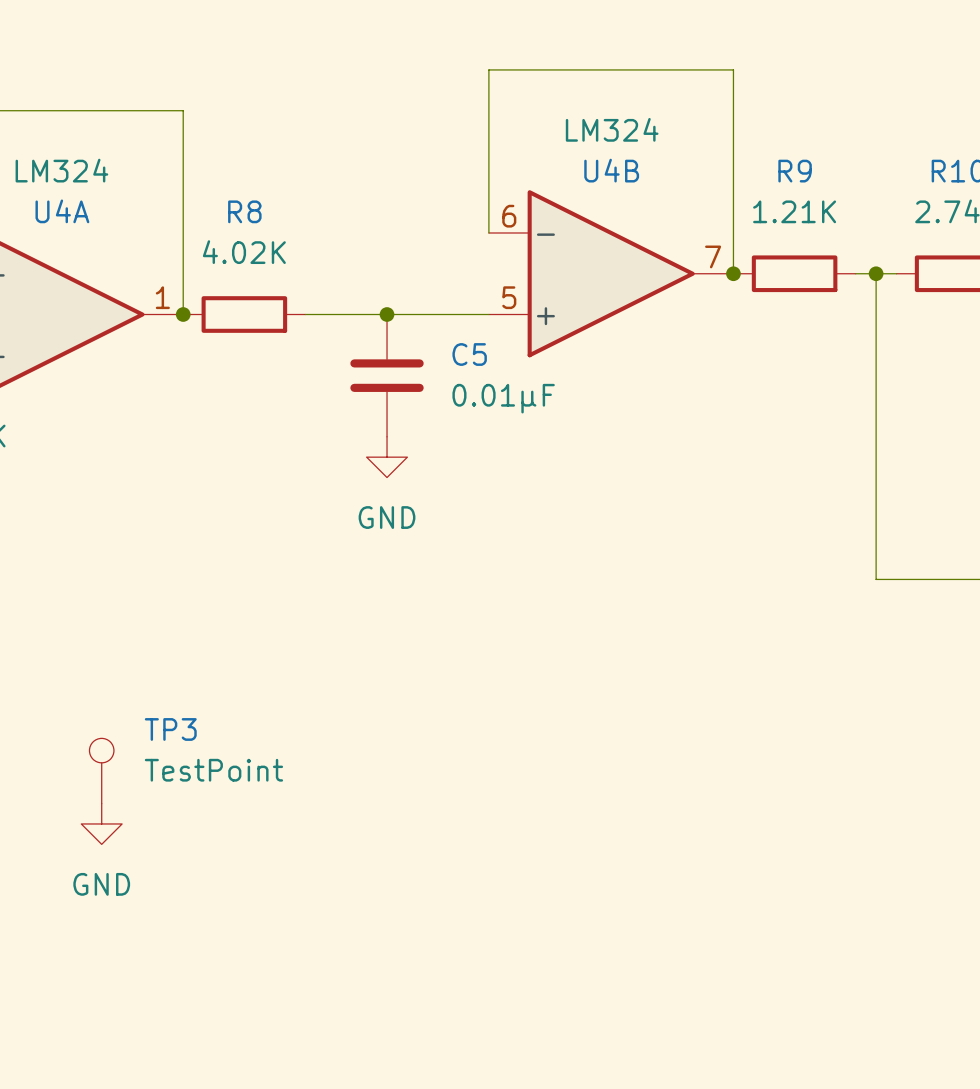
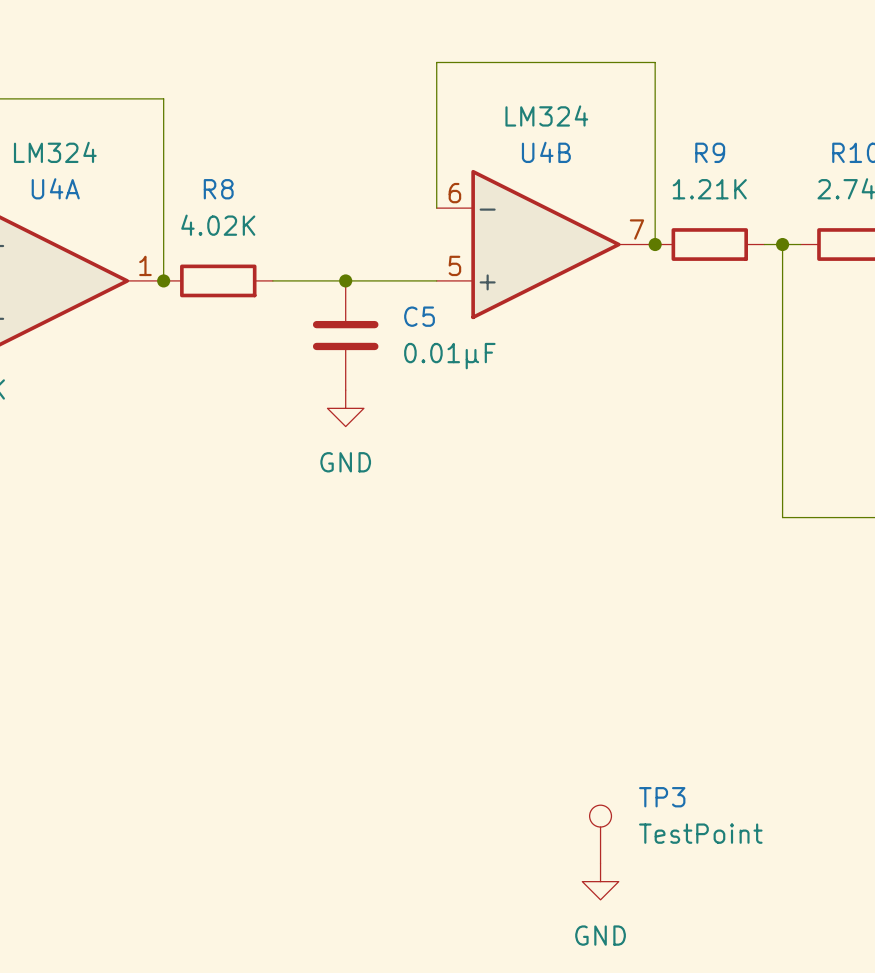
TP3 position: (101, 770) -> (600, 834)
power symbol: GND (101, 823) -> none
power symbol: none -> GND (600, 881)

